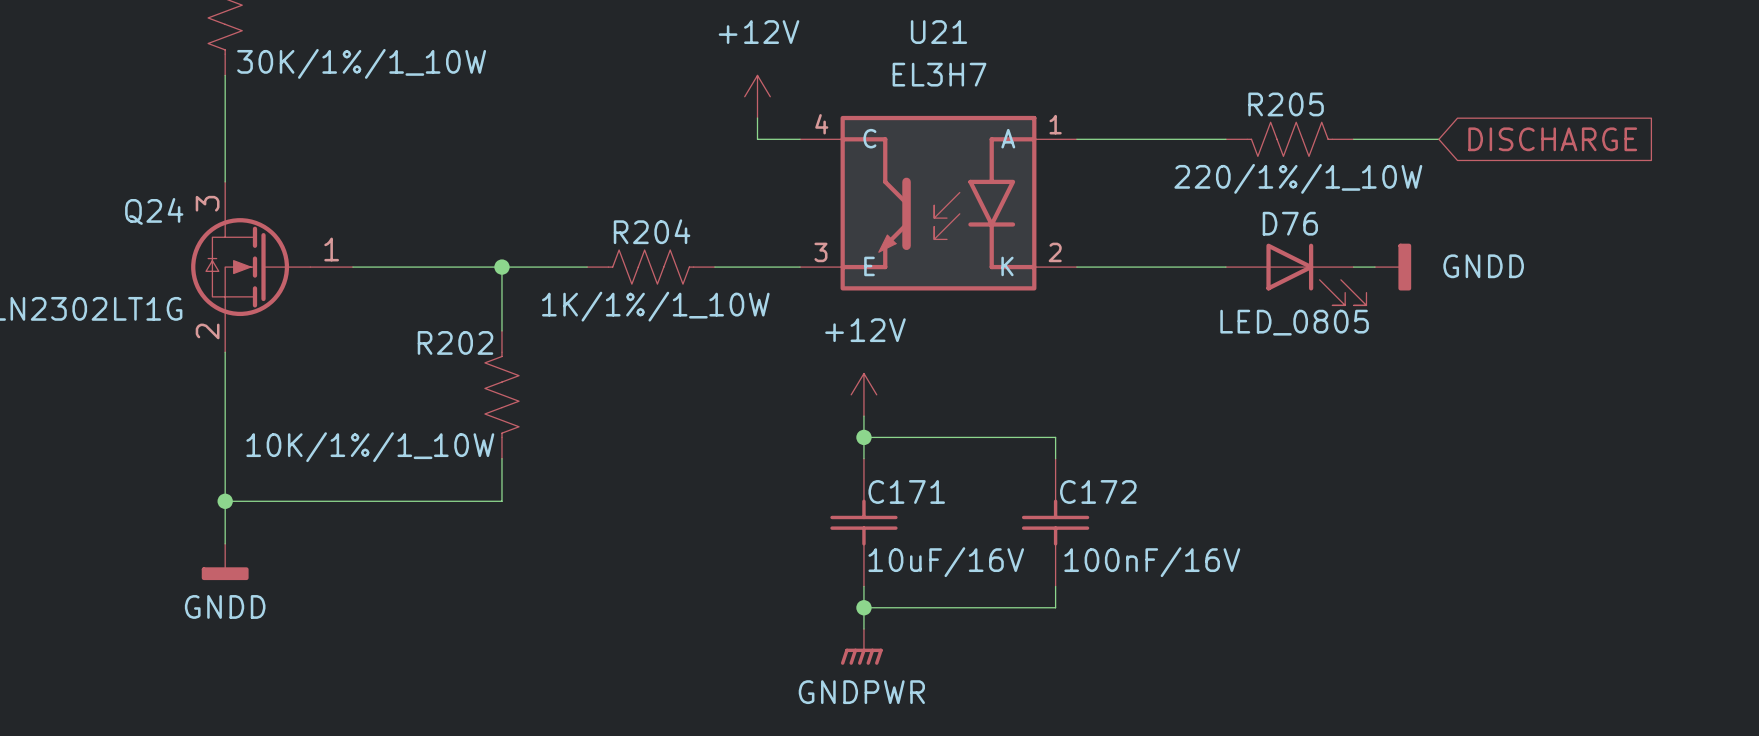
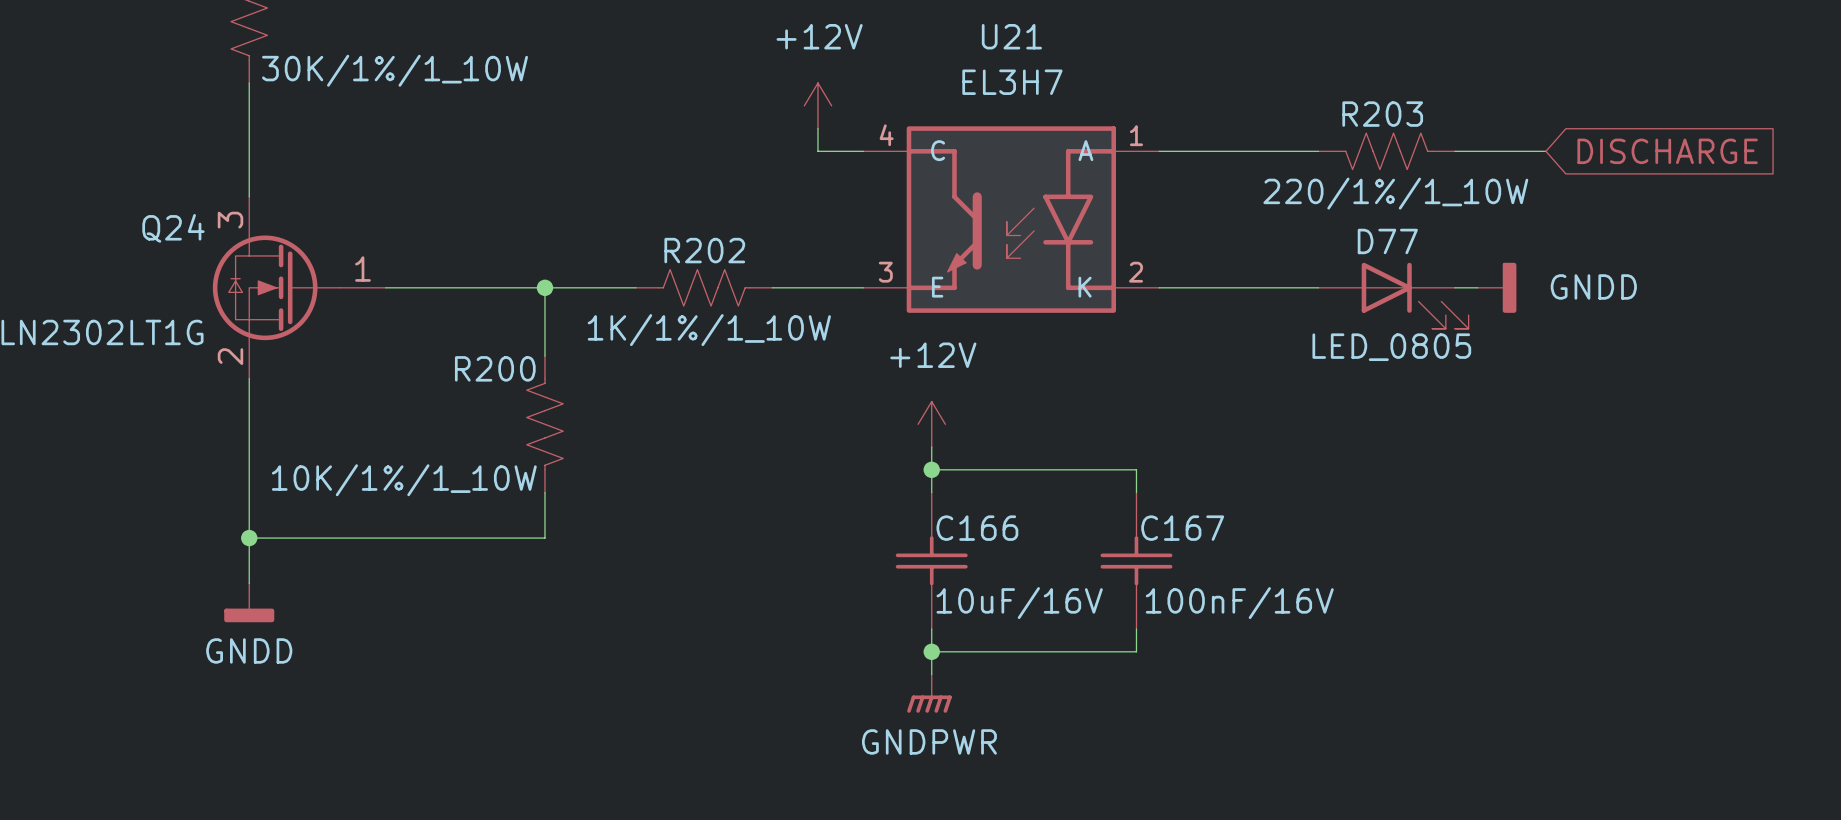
R205 name: R205 (1286, 104) -> R203 (1382, 114)
D76 name: D76 (1290, 223) -> D77 (1387, 241)
R204 name: R204 (652, 231) -> R202 (704, 250)
R202 name: R202 (455, 342) -> R200 (495, 368)
C171 name: C171 (906, 491) -> C166 (977, 528)
C172 name: C172 (1098, 491) -> C167 (1182, 528)

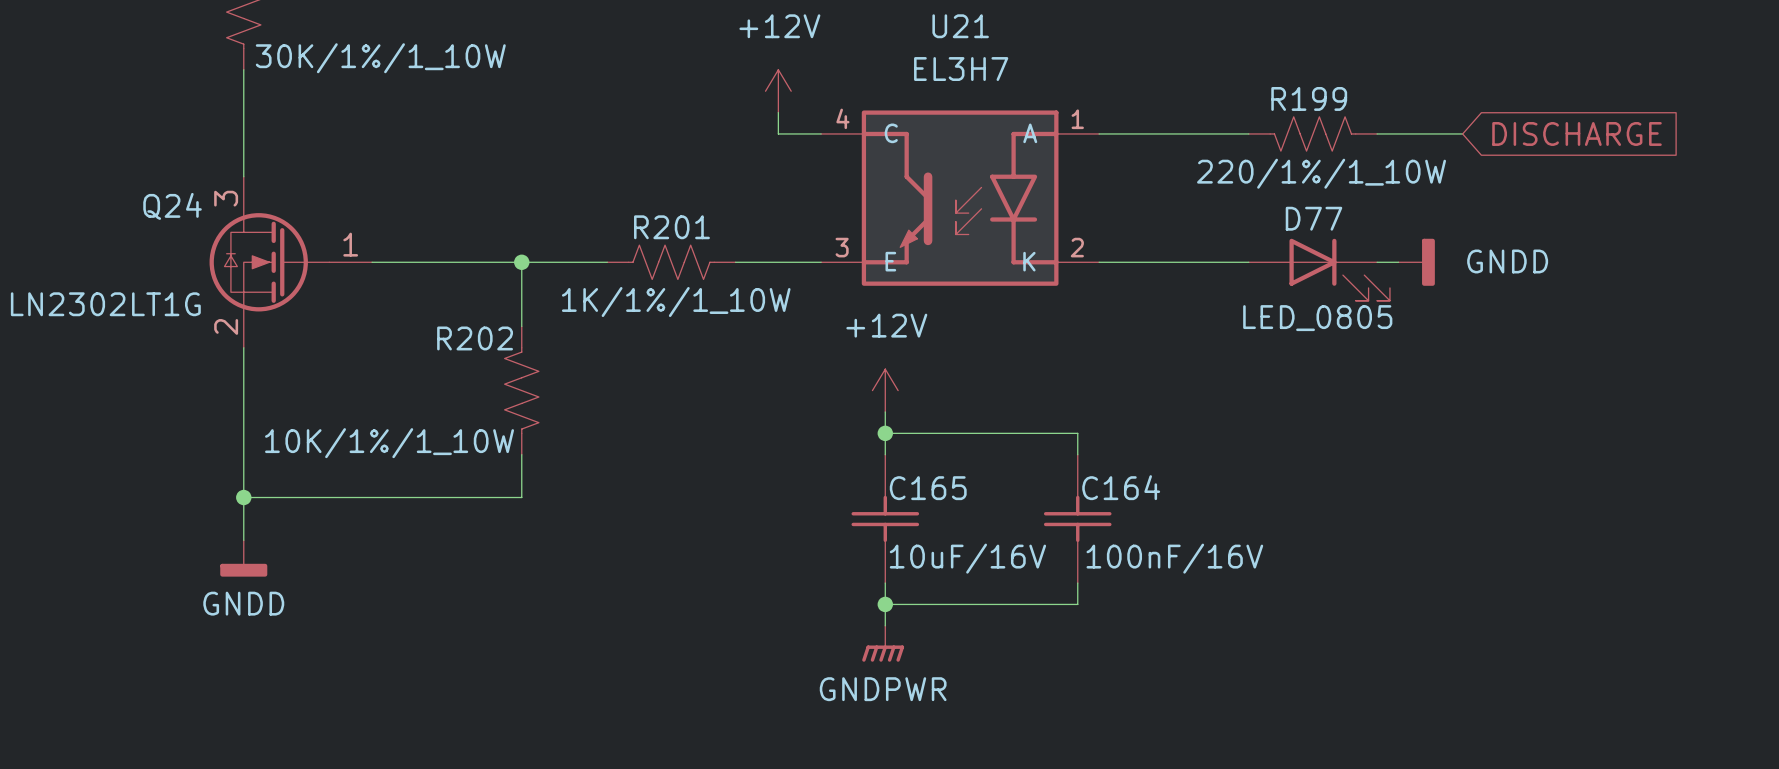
R203 name: R203 (1382, 114) -> R199 (1309, 98)
R202 name: R202 (704, 250) -> R201 (671, 227)
R200 name: R200 (495, 368) -> R202 (475, 338)
C166 name: C166 (977, 528) -> C165 (928, 488)
C167 name: C167 (1182, 528) -> C164 (1121, 487)

